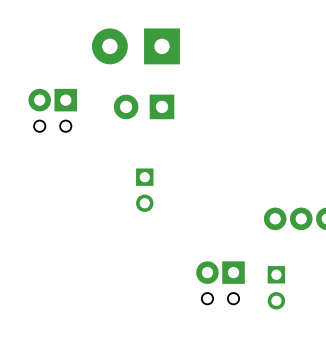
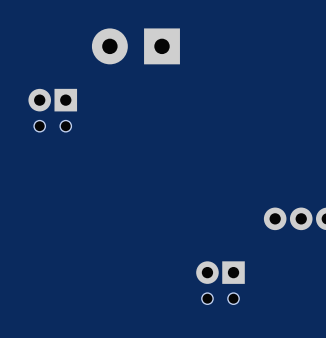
part: (144, 106) -> none
part: (144, 190) -> none
part: (276, 287) -> none

